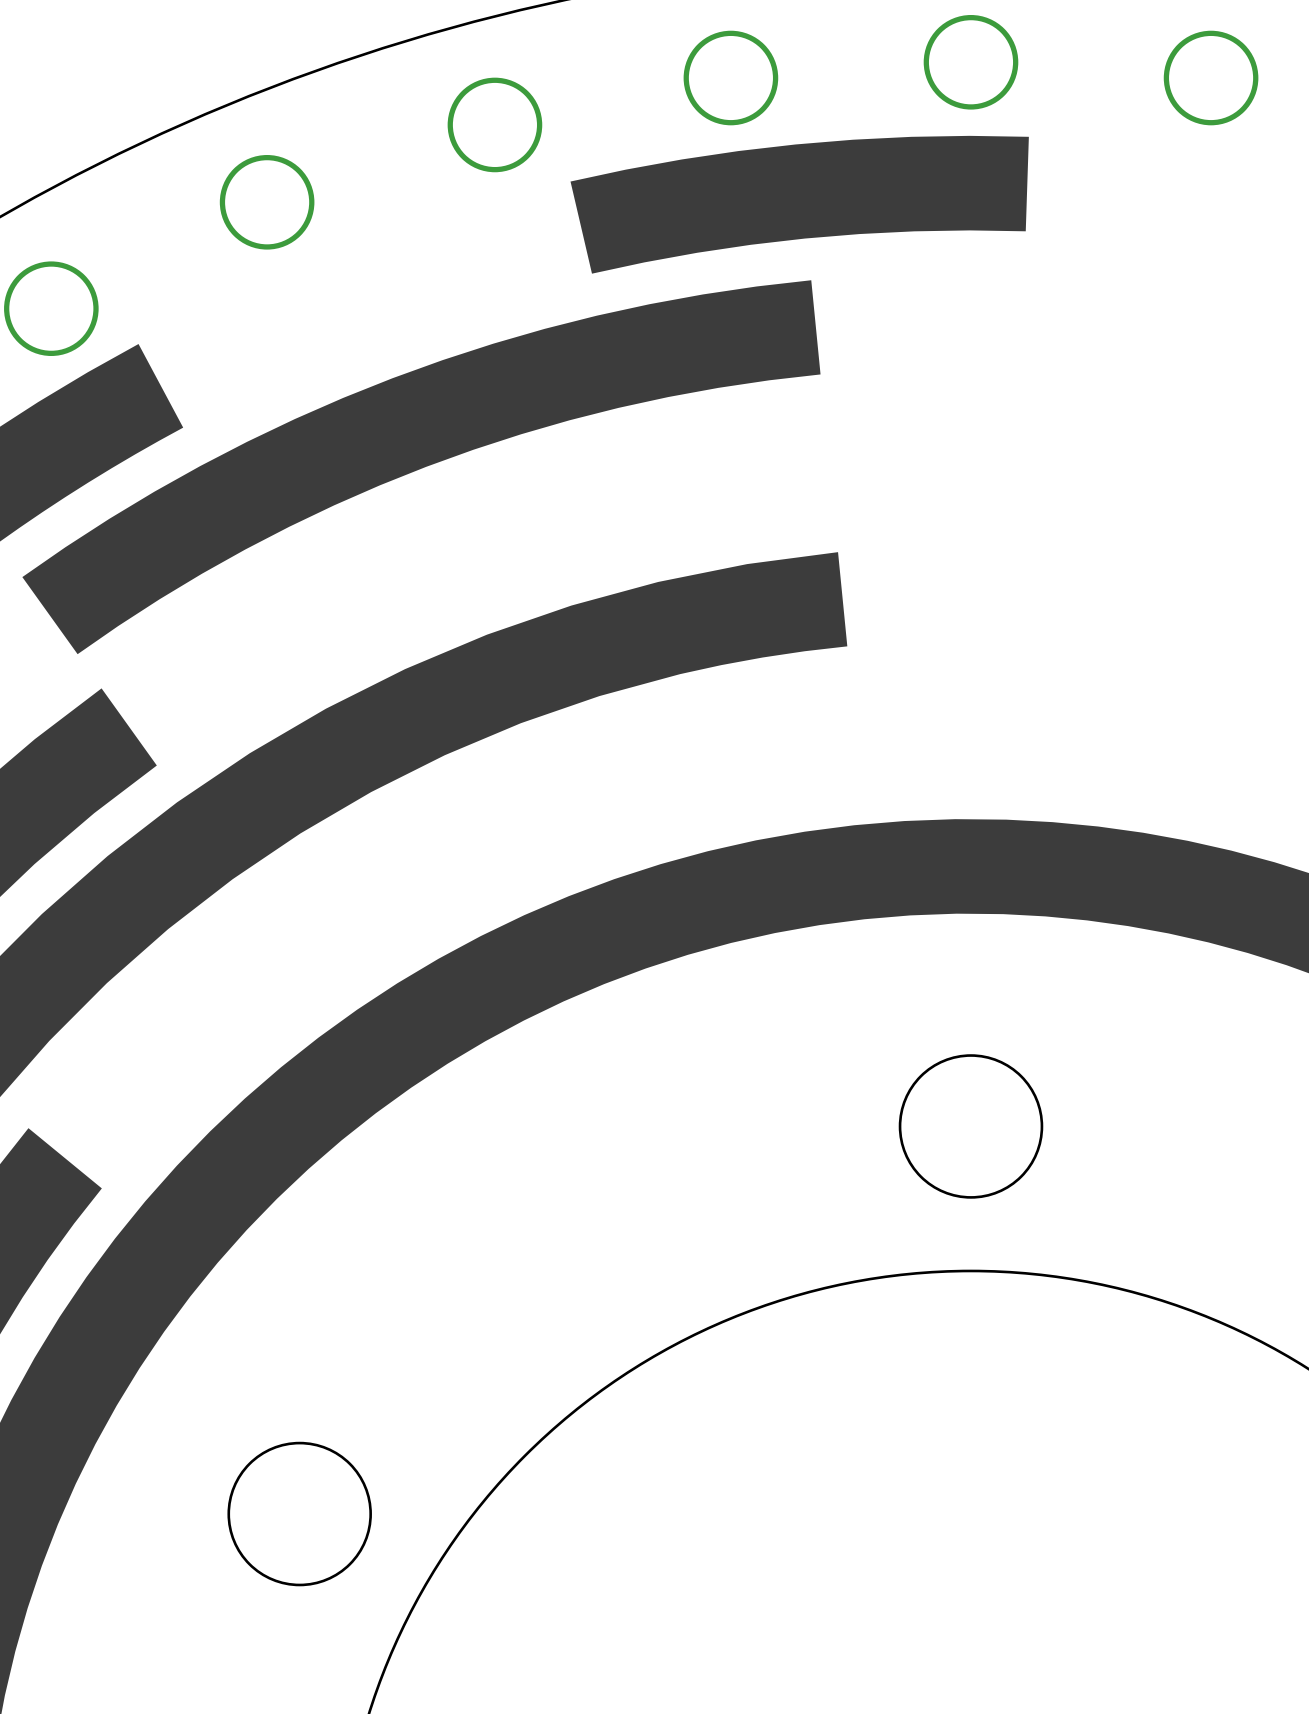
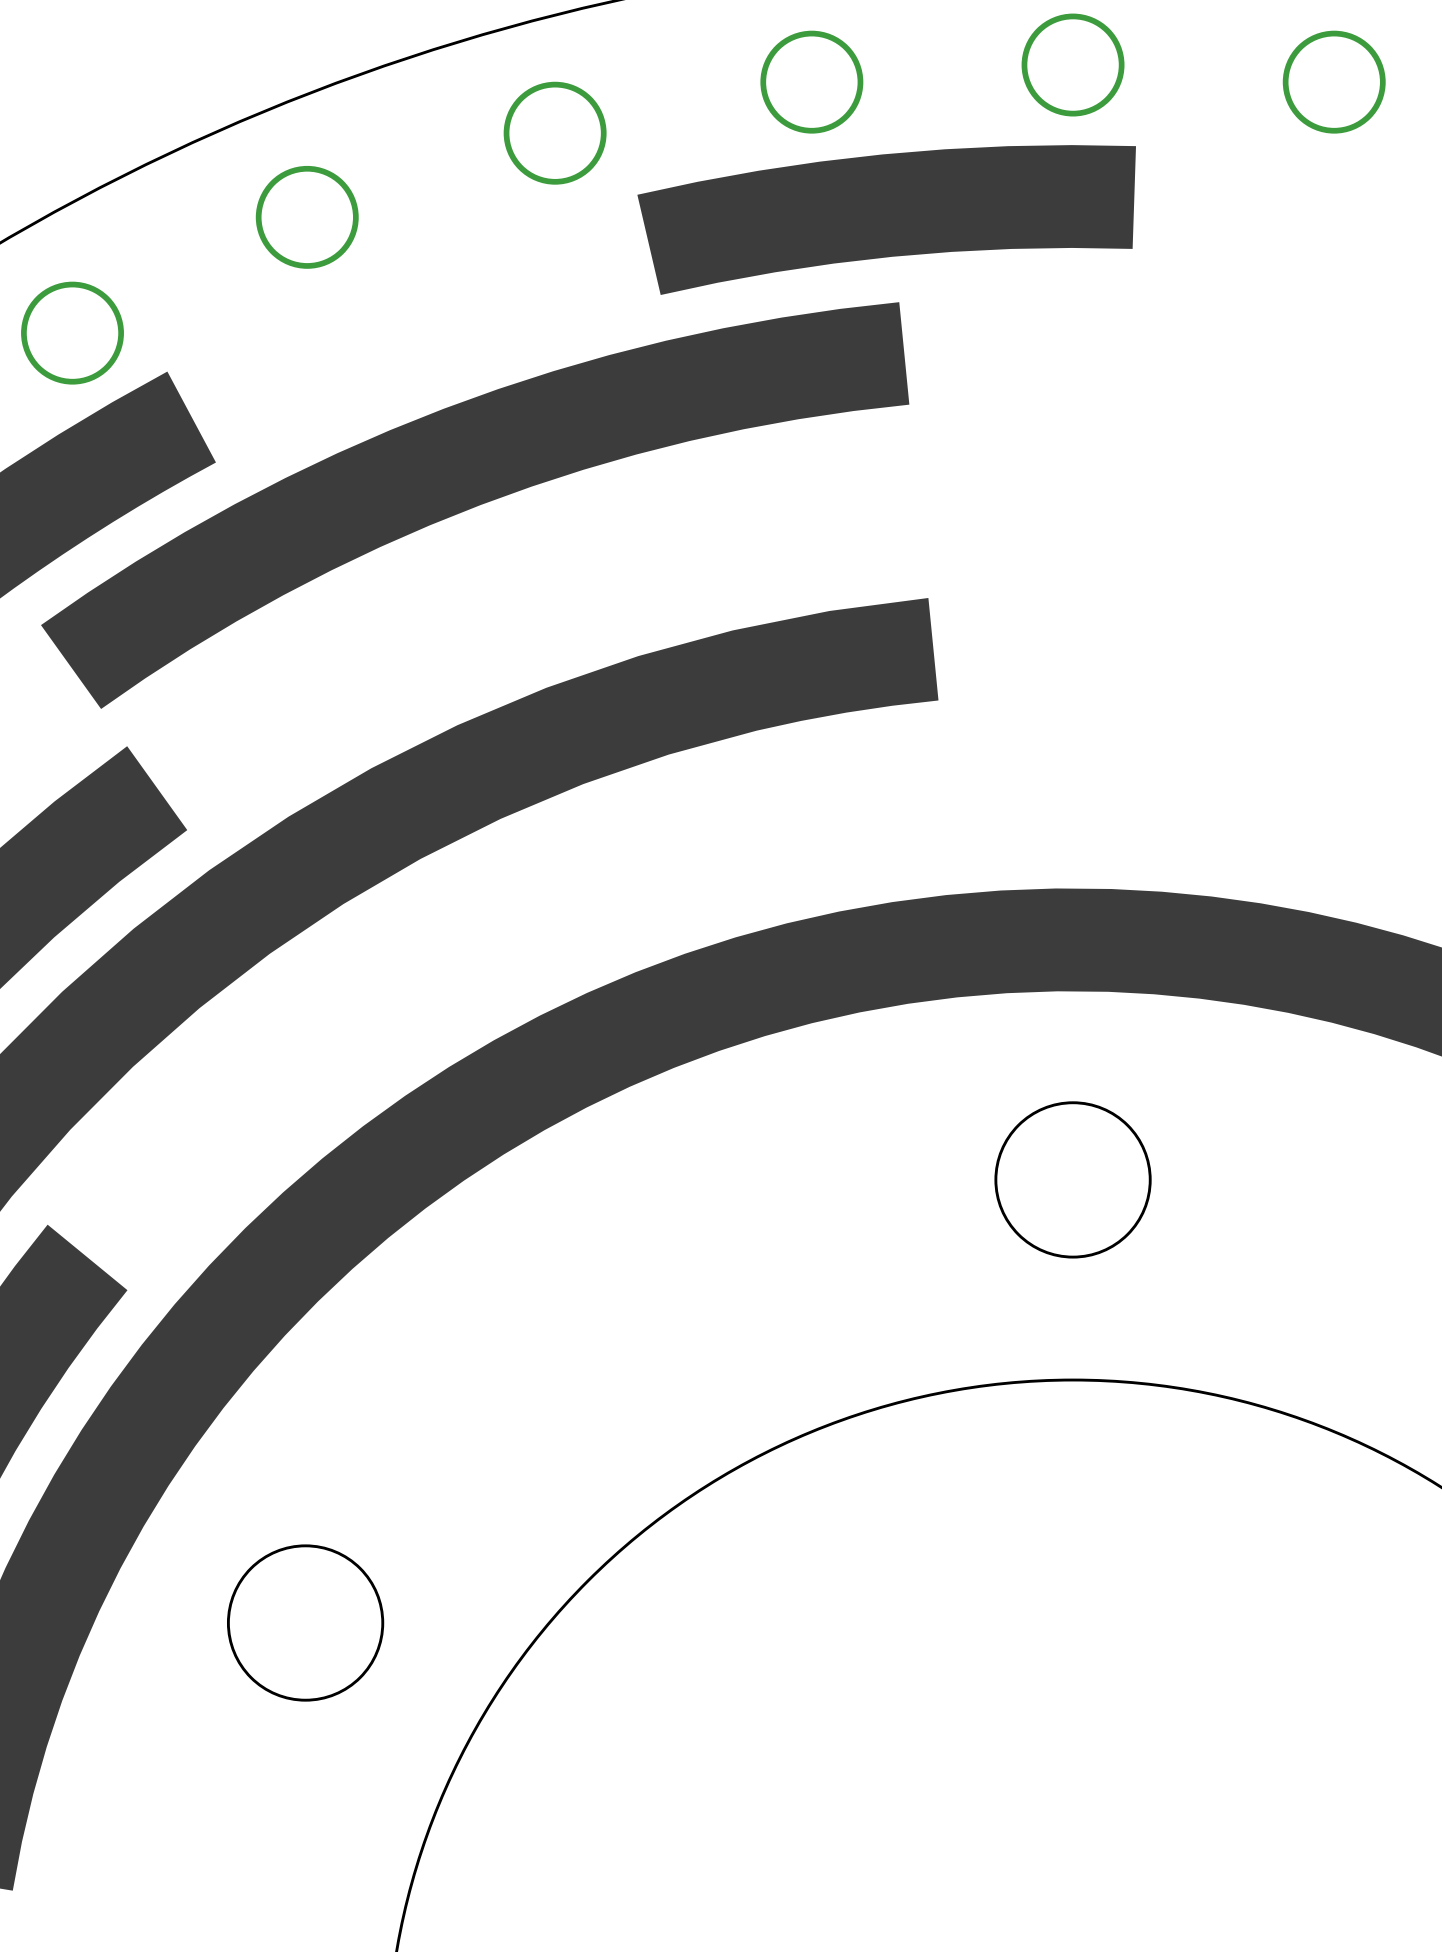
round board edge position: (970, 1126) -> (1073, 1179)
round board edge position: (299, 1514) -> (305, 1623)

